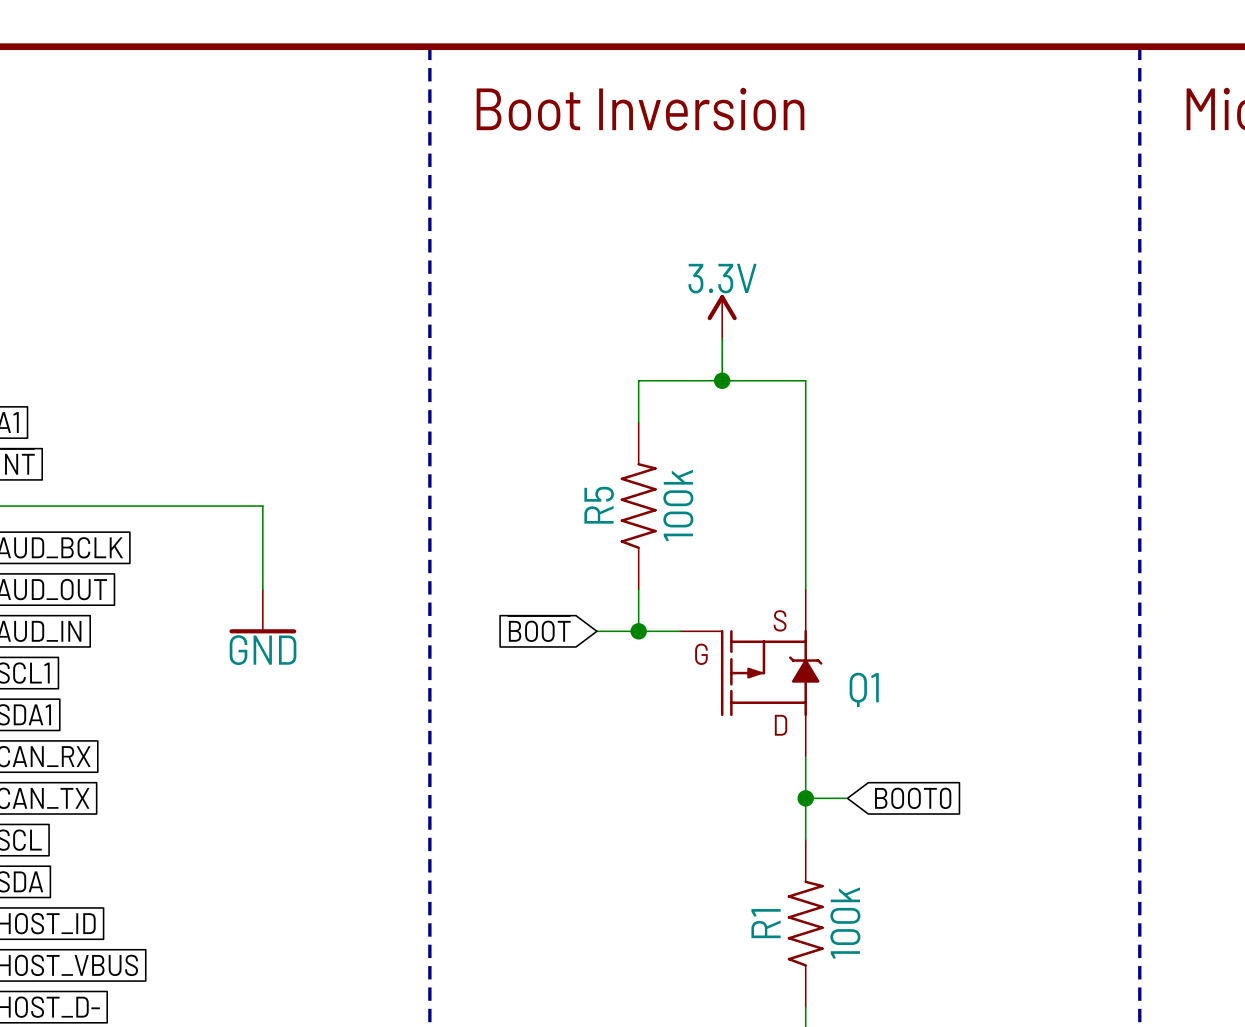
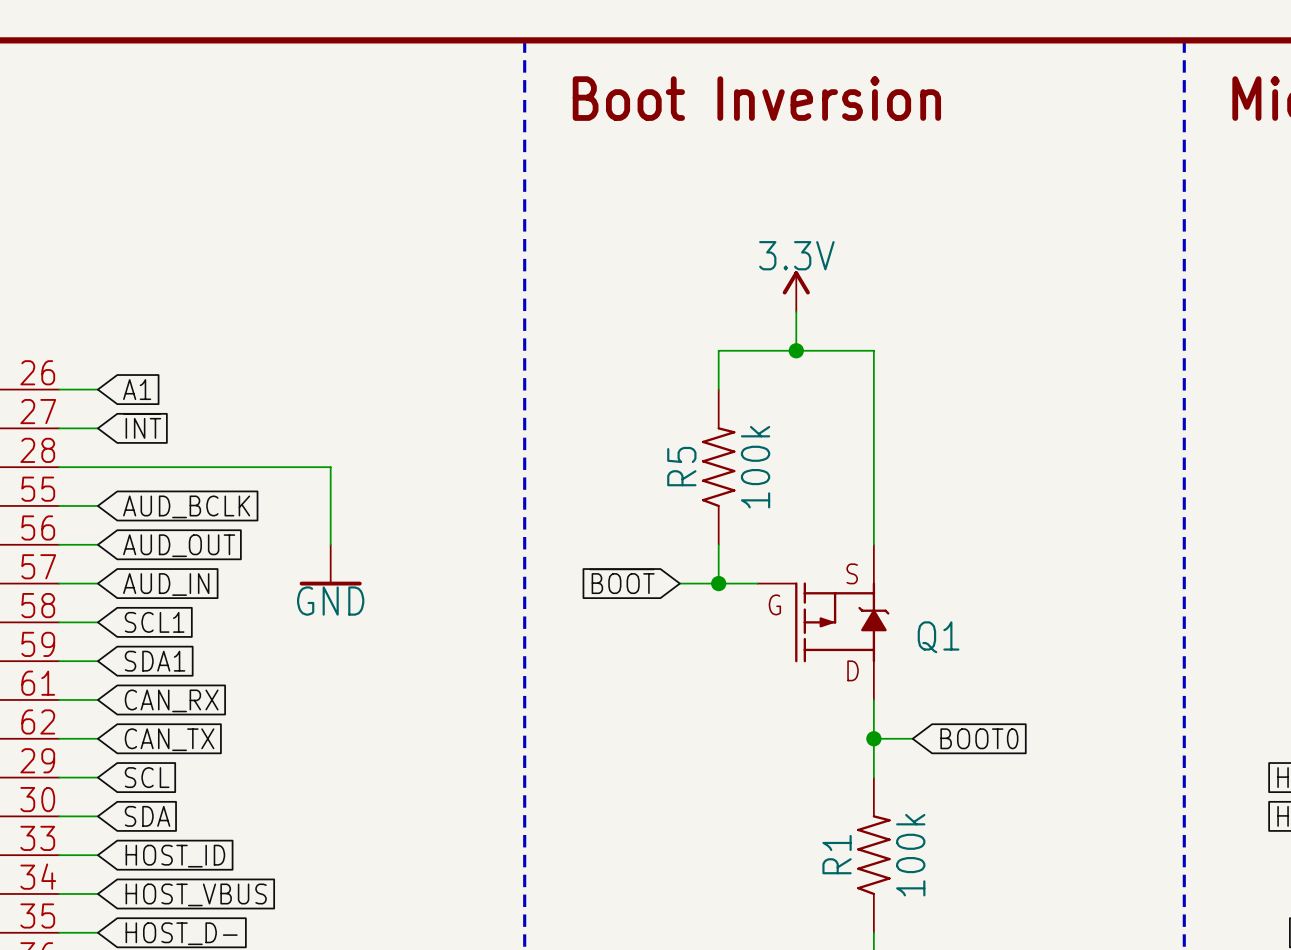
wire: (221, 506) (262, 506) (262, 589) -> (330, 467) (330, 544)
power symbol position: GND (262, 611) -> GND (330, 565)

